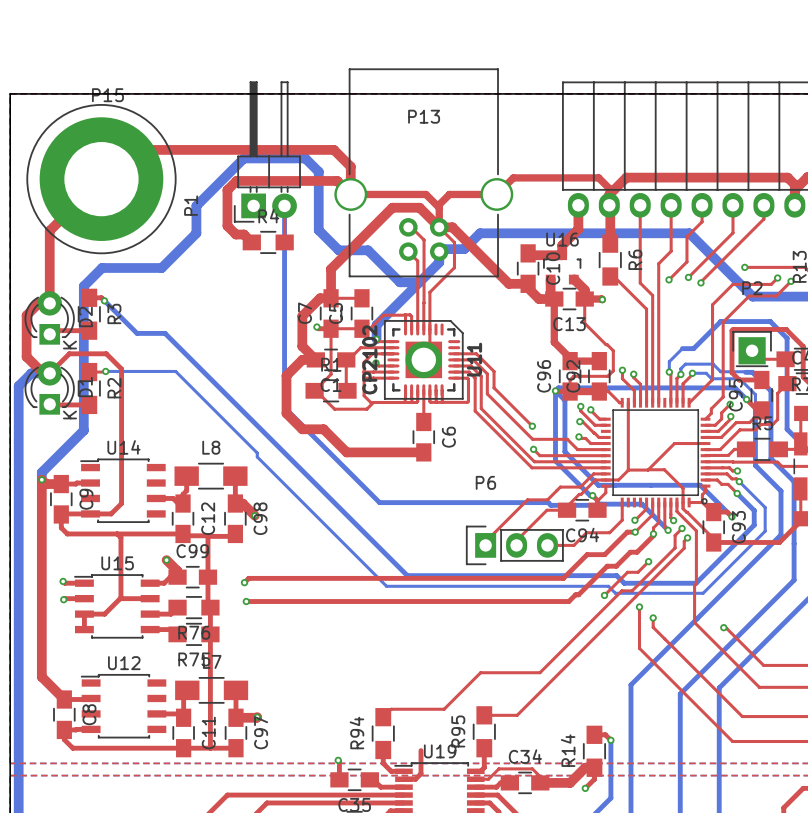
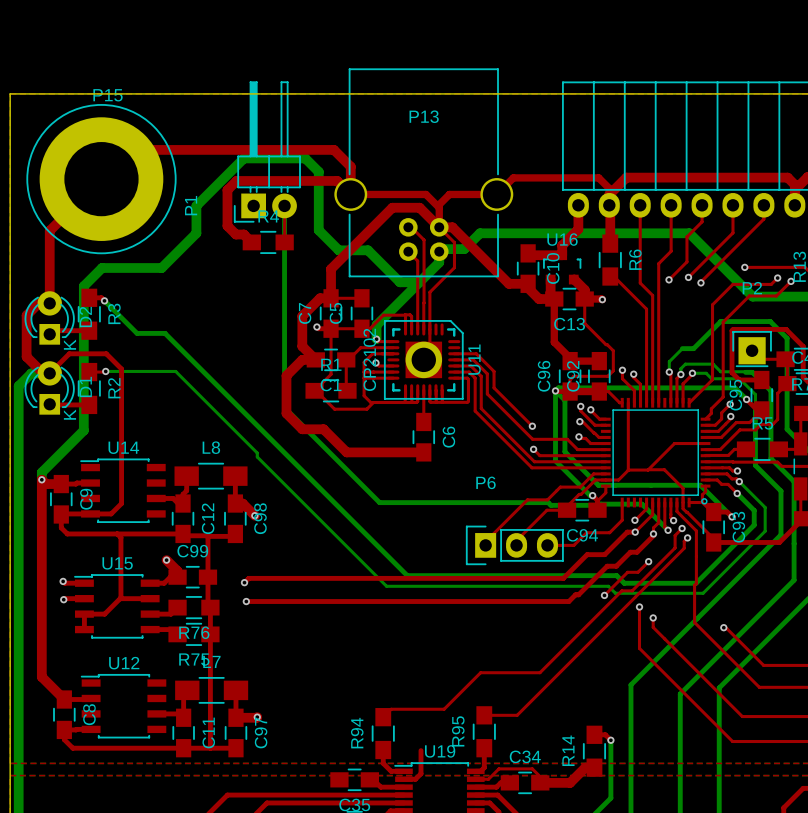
top track: (338, 760) (339, 779) -> none
via: (338, 760) -> none
top track: (594, 767) (594, 779) (585, 788) -> none
via: (585, 788) -> none

